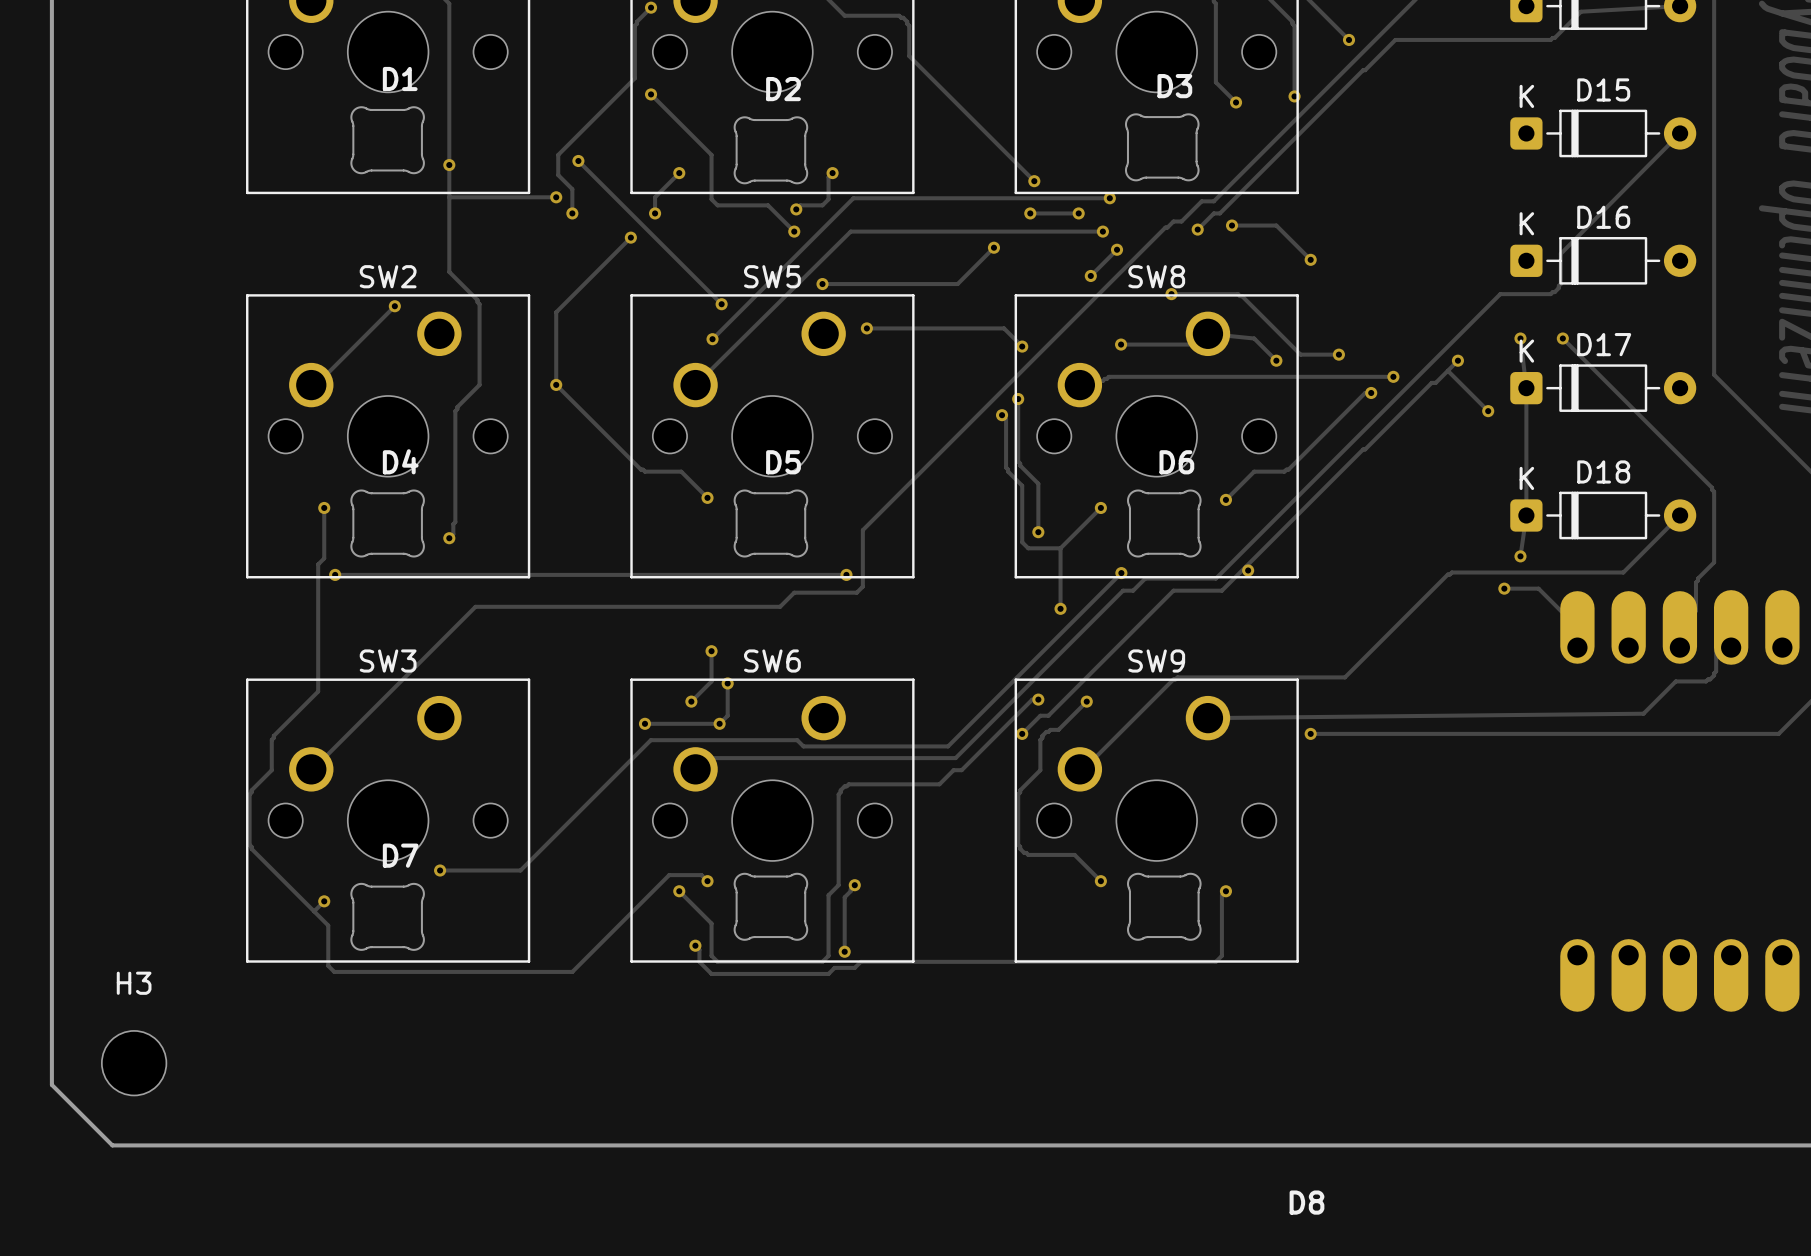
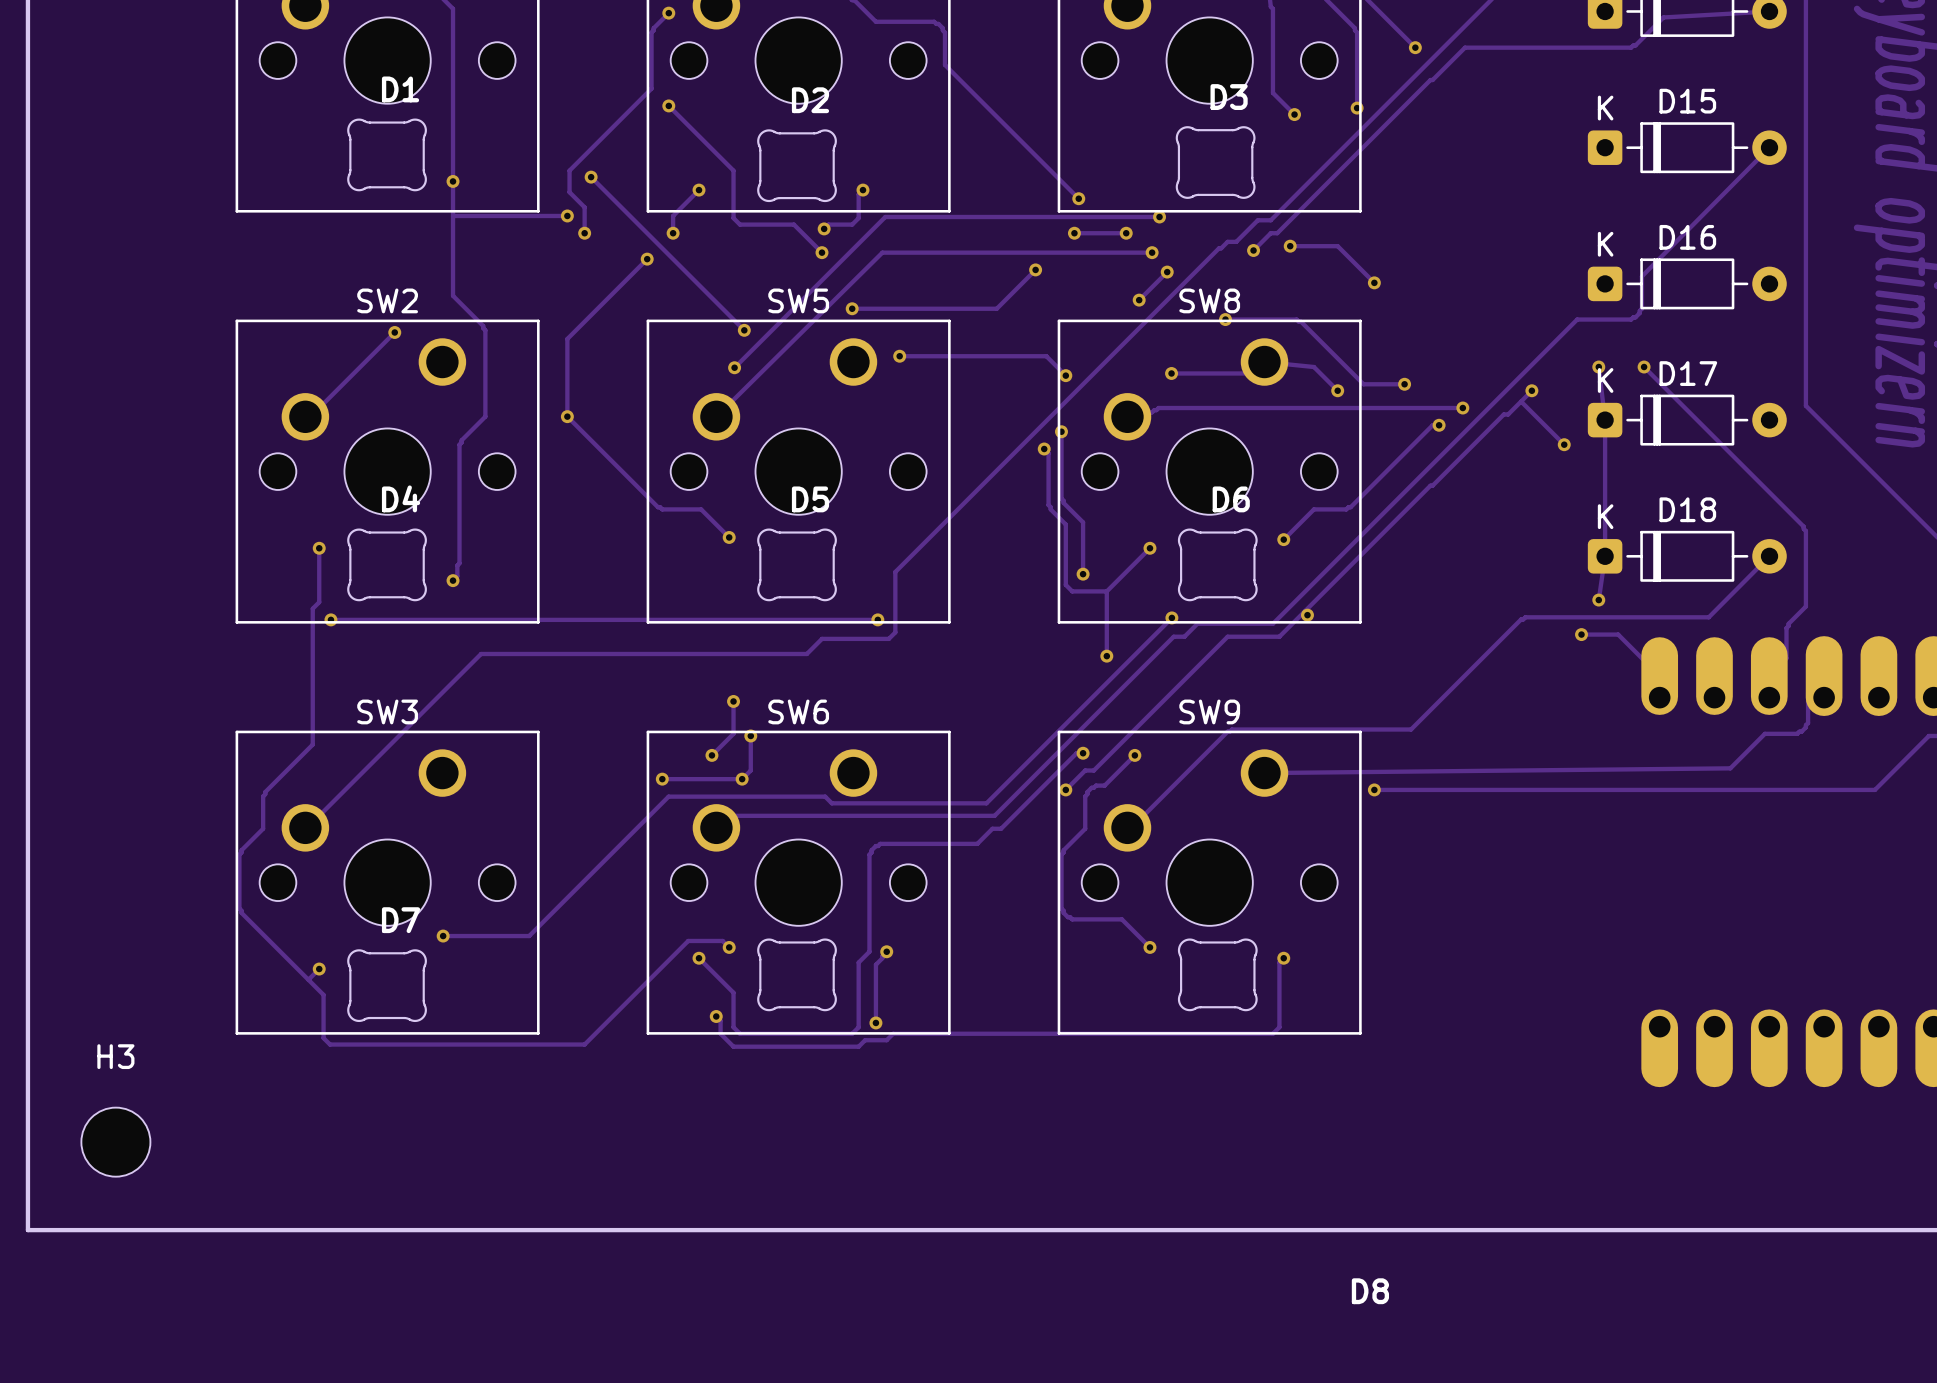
board edge: (51, 1084) (112, 1145) -> (27, 1165) (27, 1230) (92, 1230)

